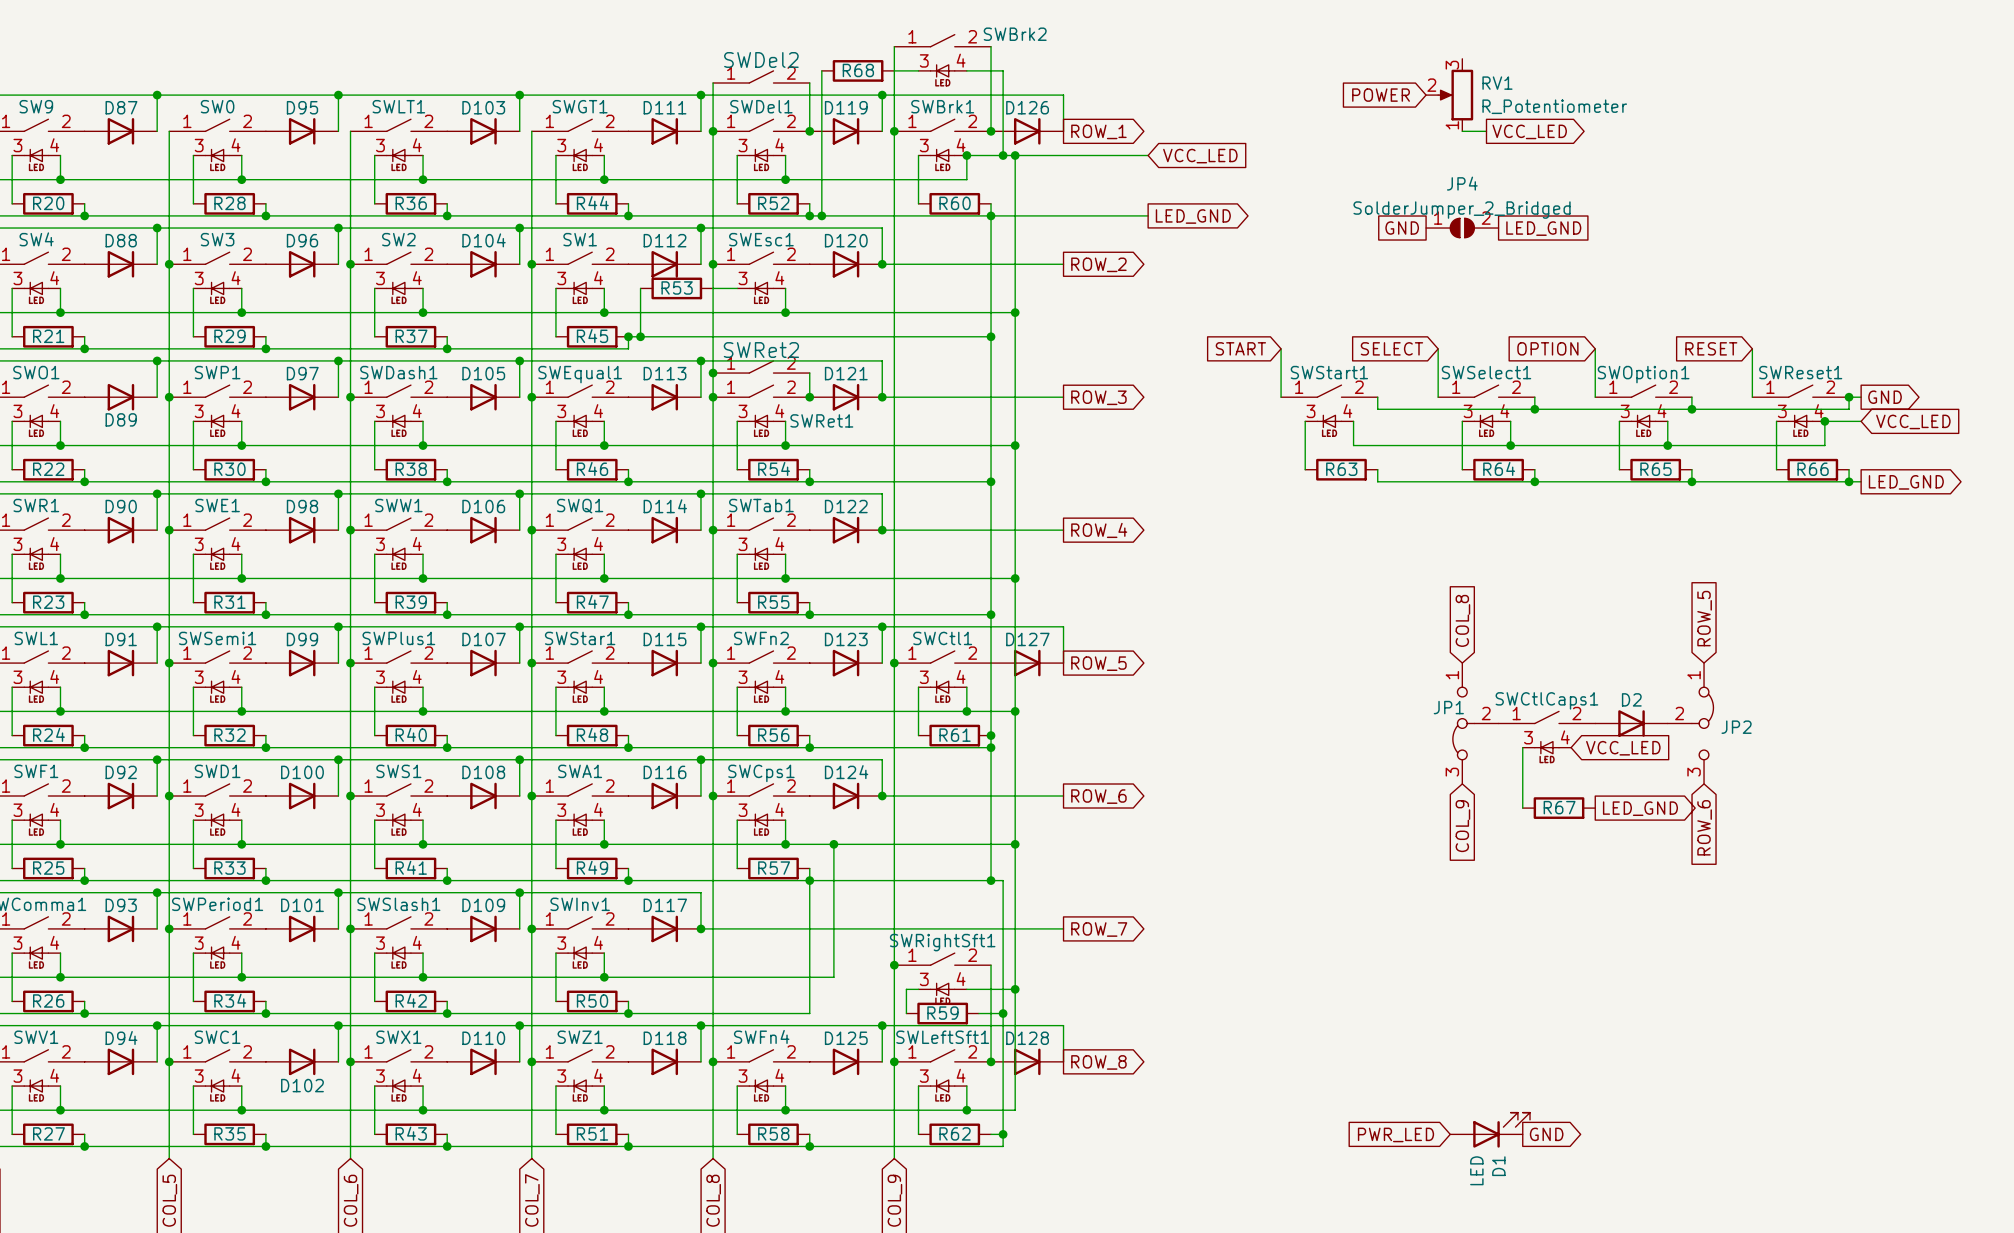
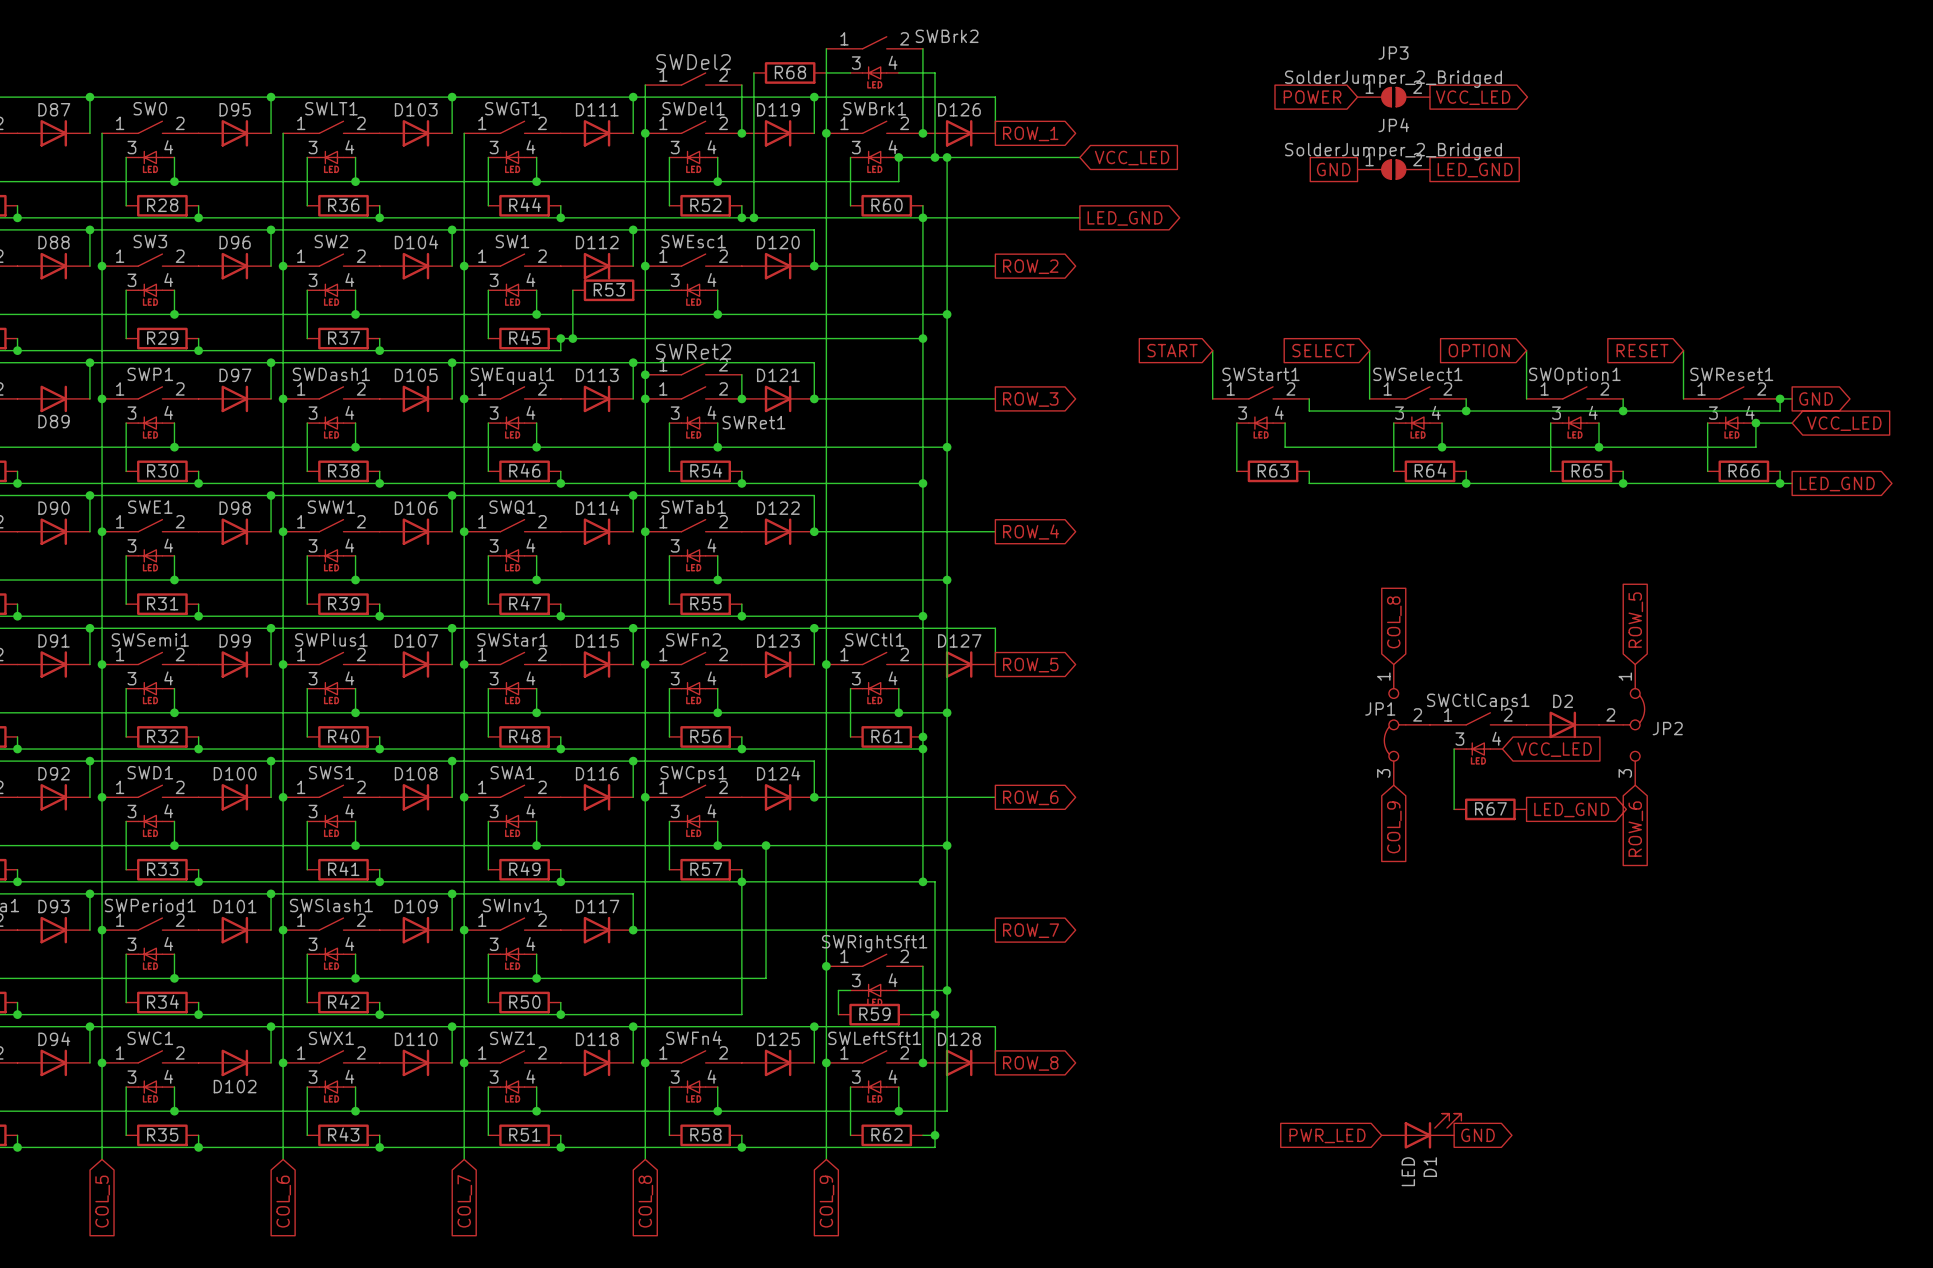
RV1: R_Potentiometer (1449, 95) -> none
JP3: none -> SolderJumper_2_Bridged (1393, 97)
wire: (1462, 131) (1486, 131) -> none
global label position: VCC_LED (1529, 131) -> VCC_LED (1473, 97)
global label position: GND (1402, 228) -> GND (1333, 169)
JP4 position: (1462, 228) -> (1393, 169)
global label position: LED_GND (1543, 228) -> LED_GND (1475, 170)

